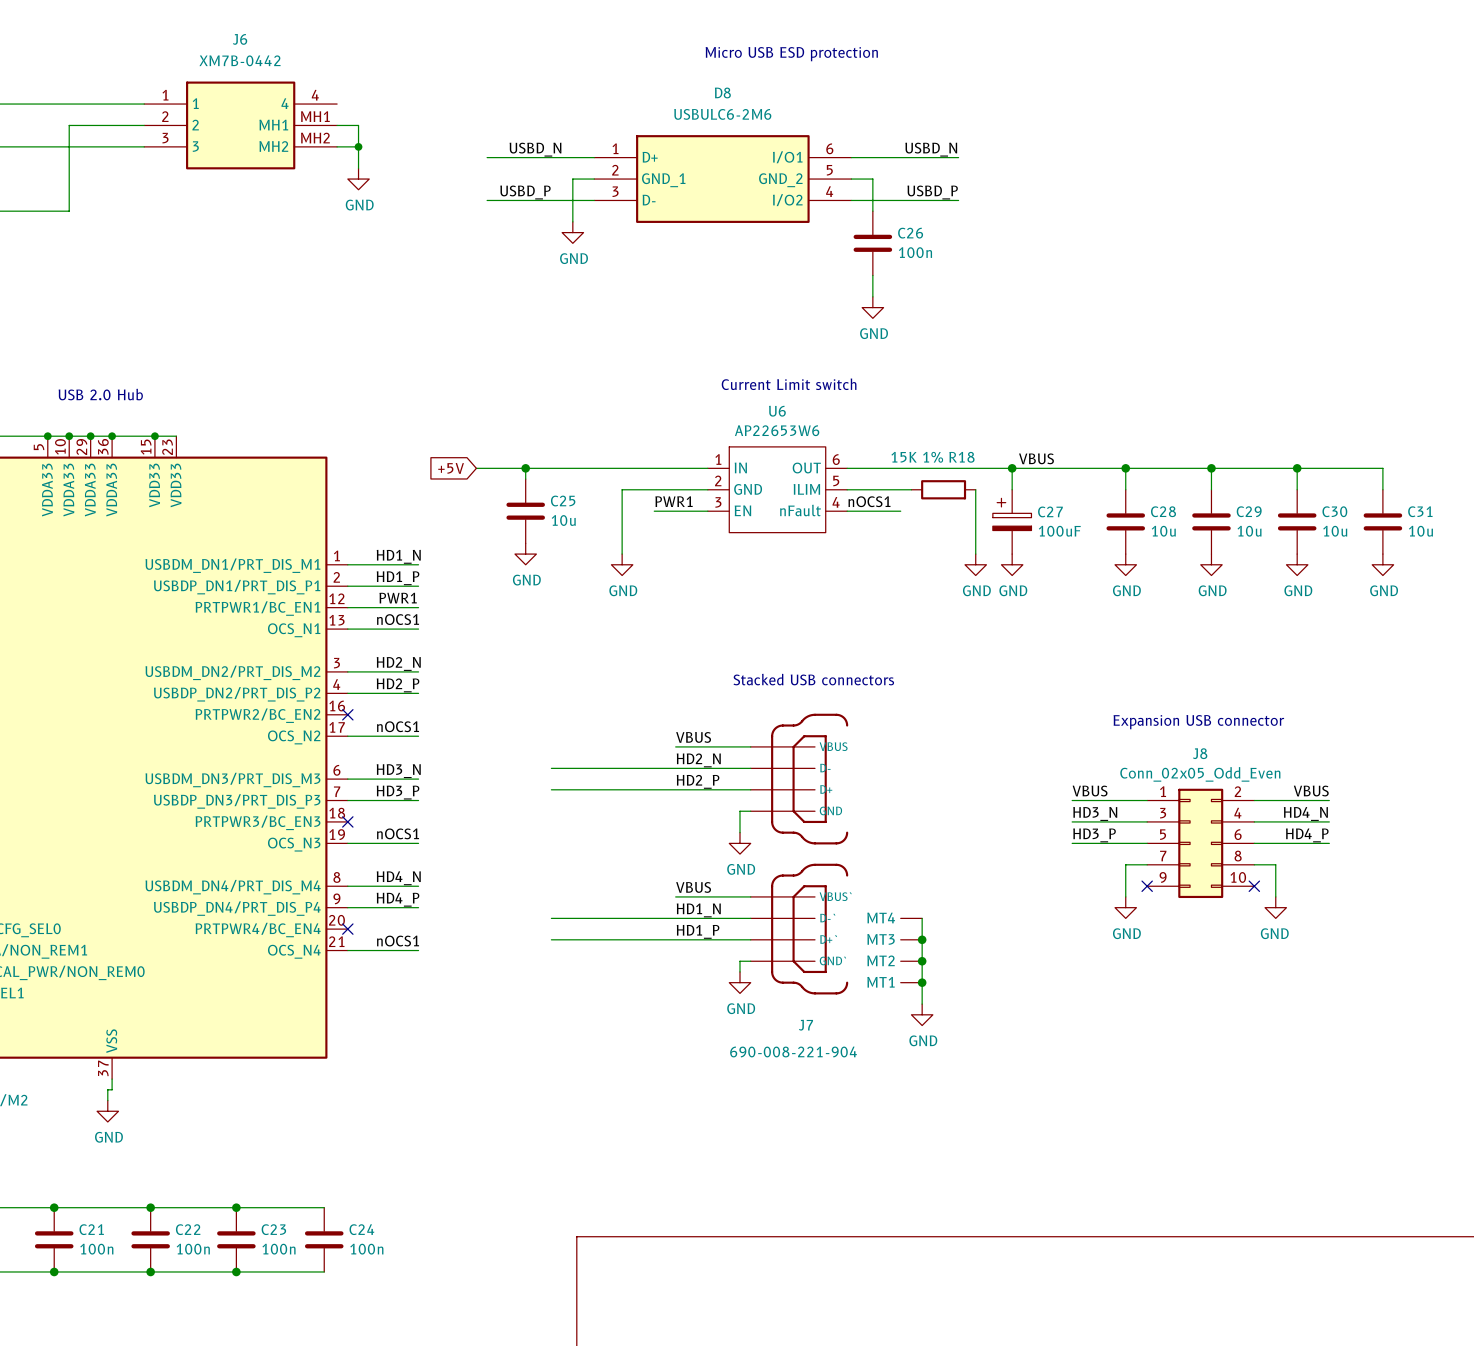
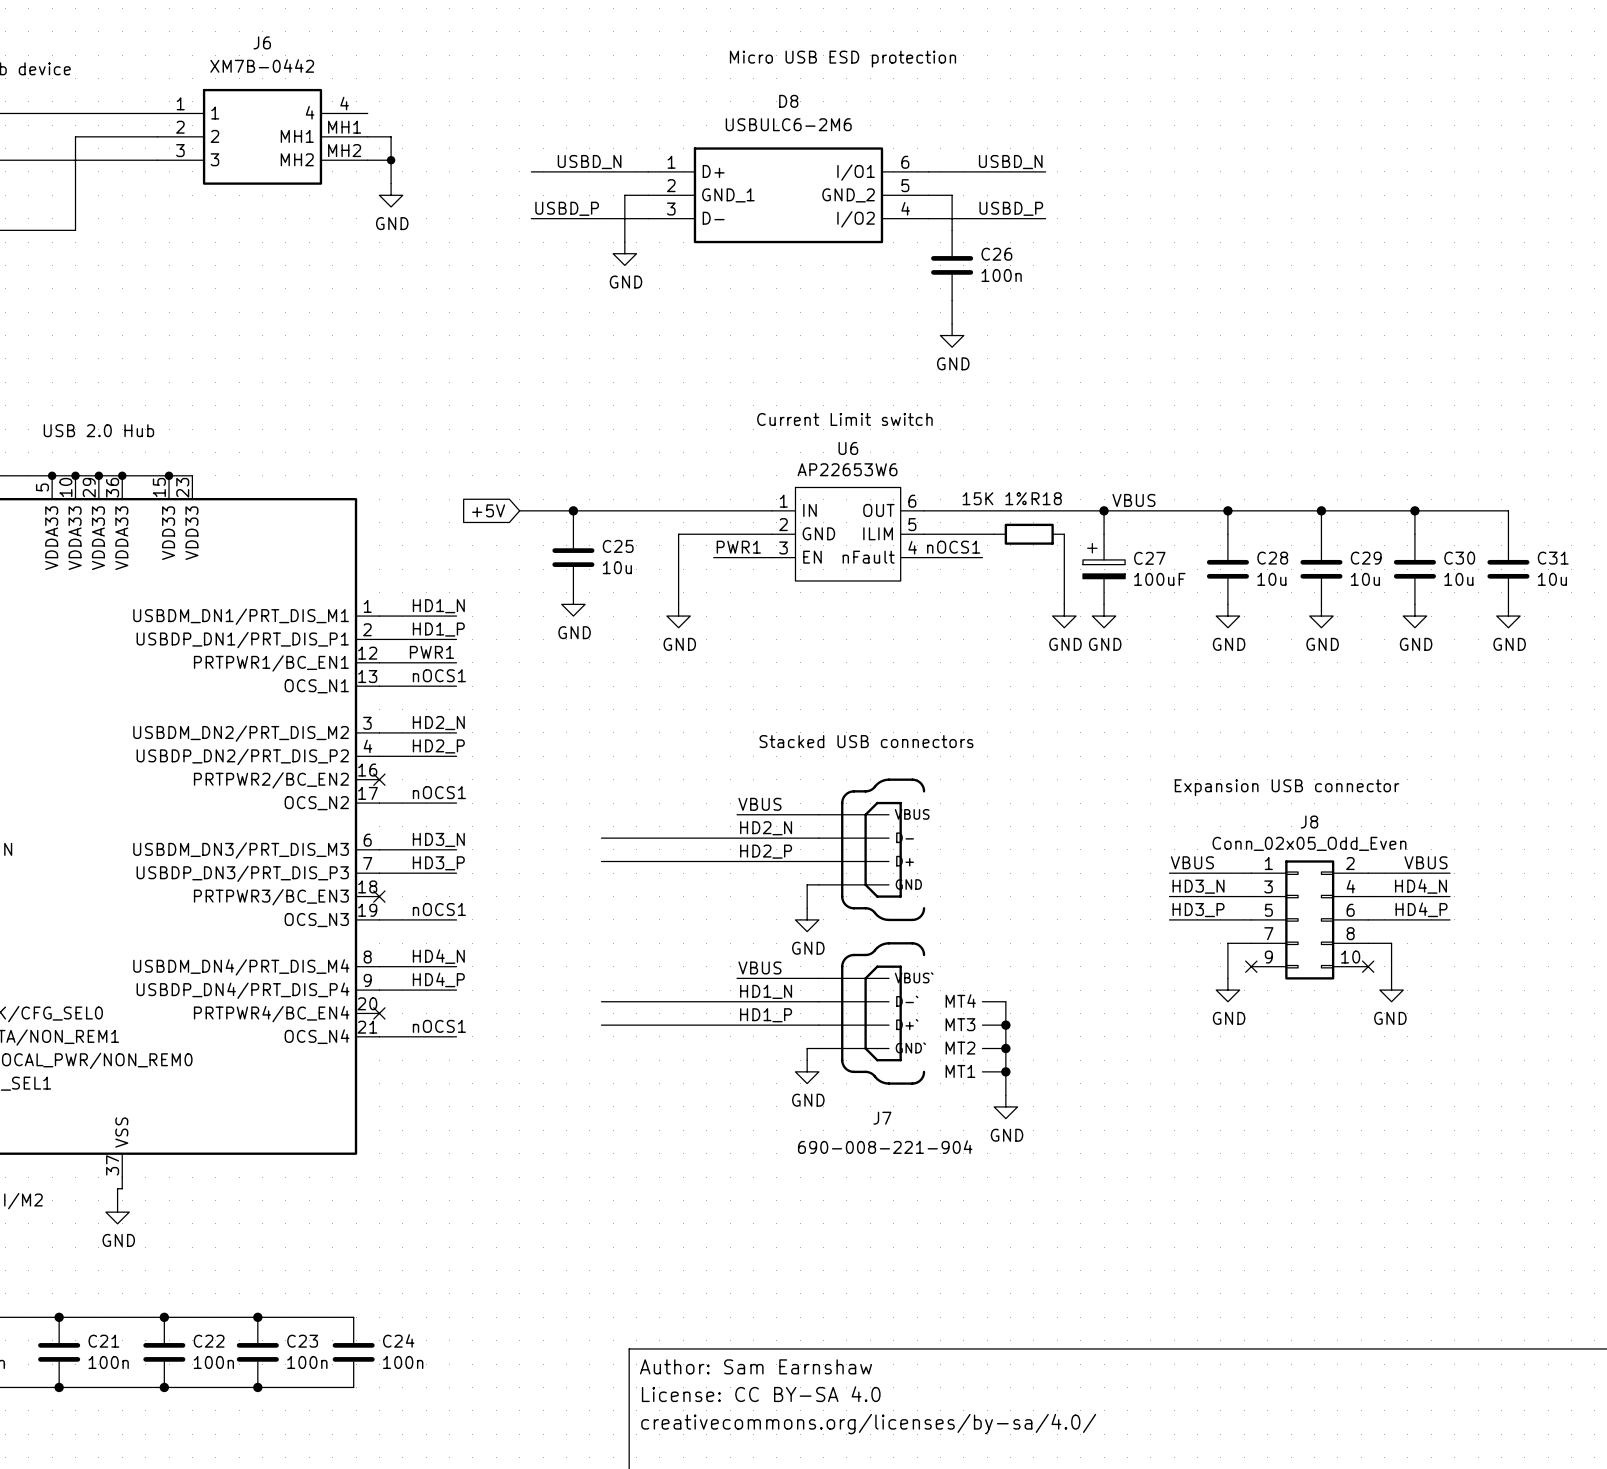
title block: none -> Author: Sam Earnshaw (755, 1366)
title block: none -> License: CC BY-SA 4.0 (761, 1394)
title block: none -> creativecommons.org/licenses/by-sa/4.0/ (868, 1424)

